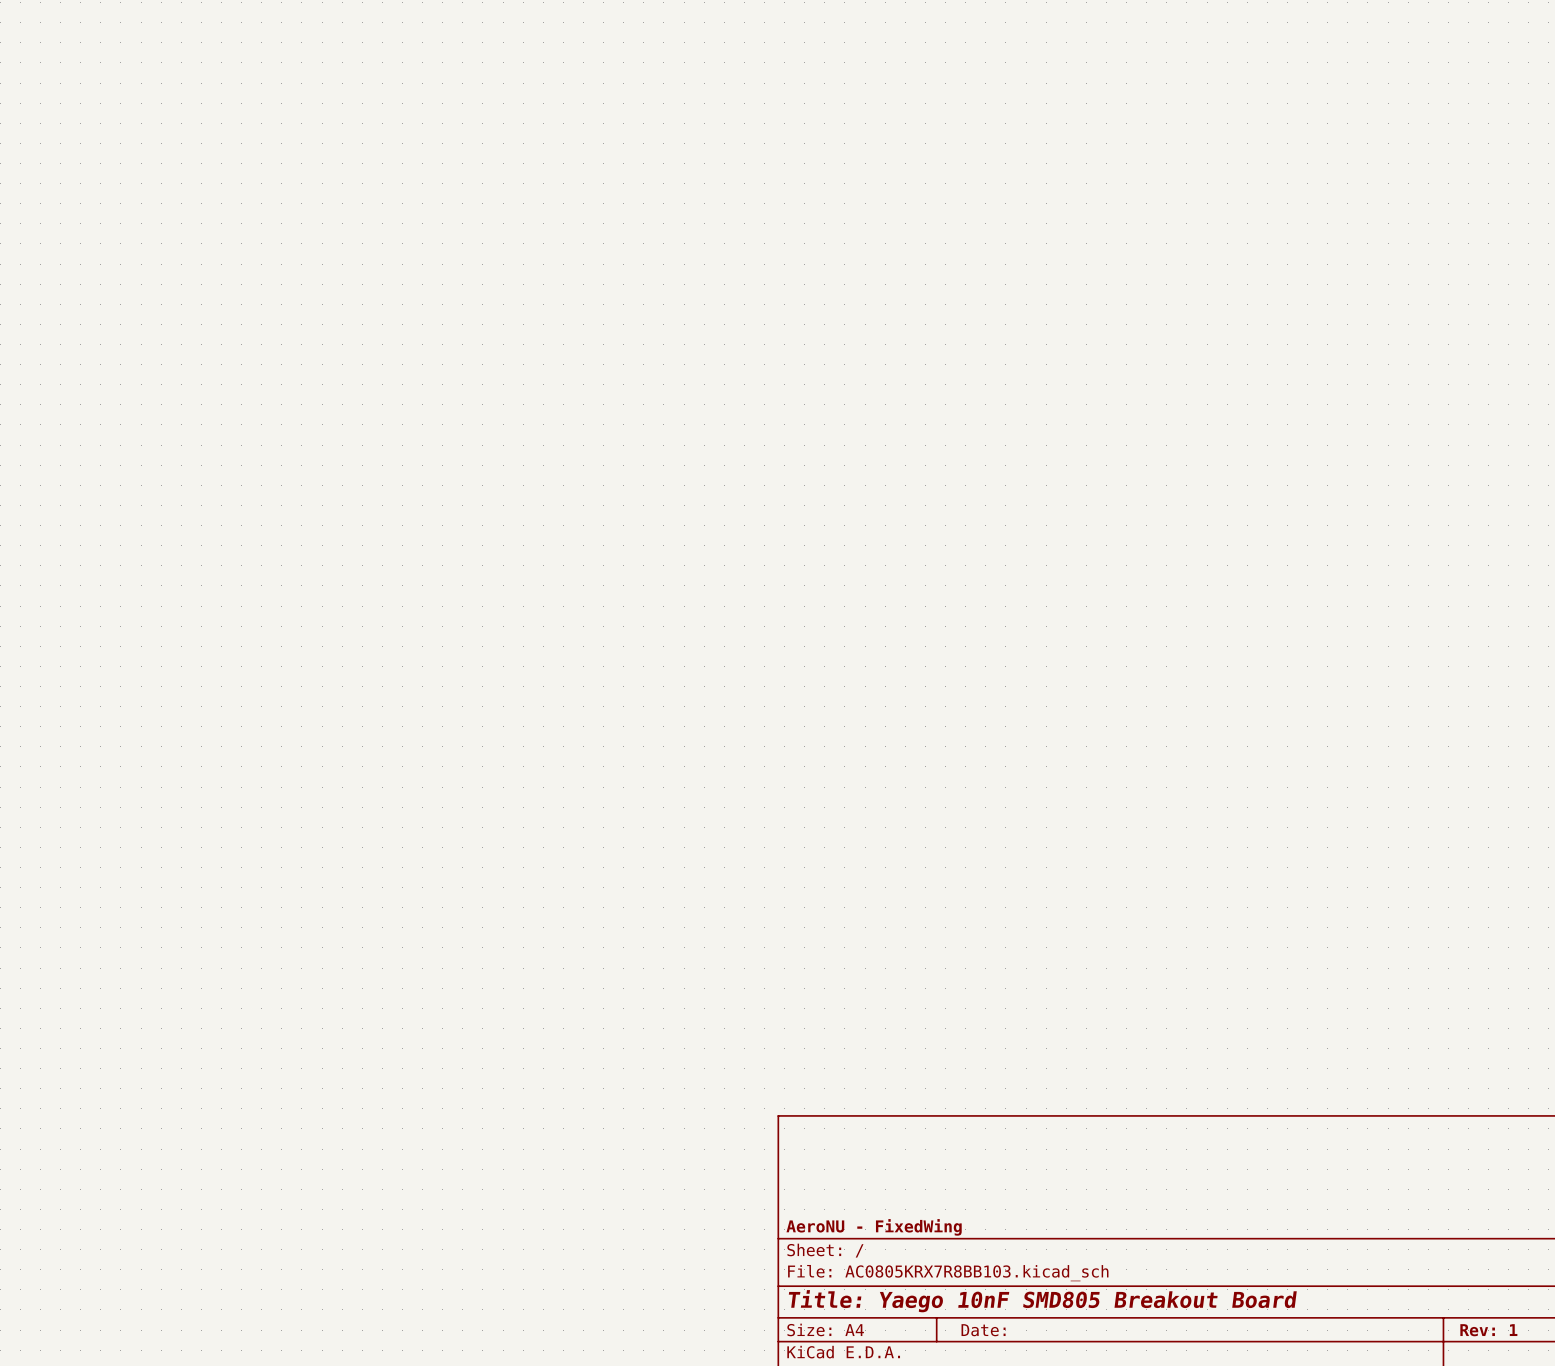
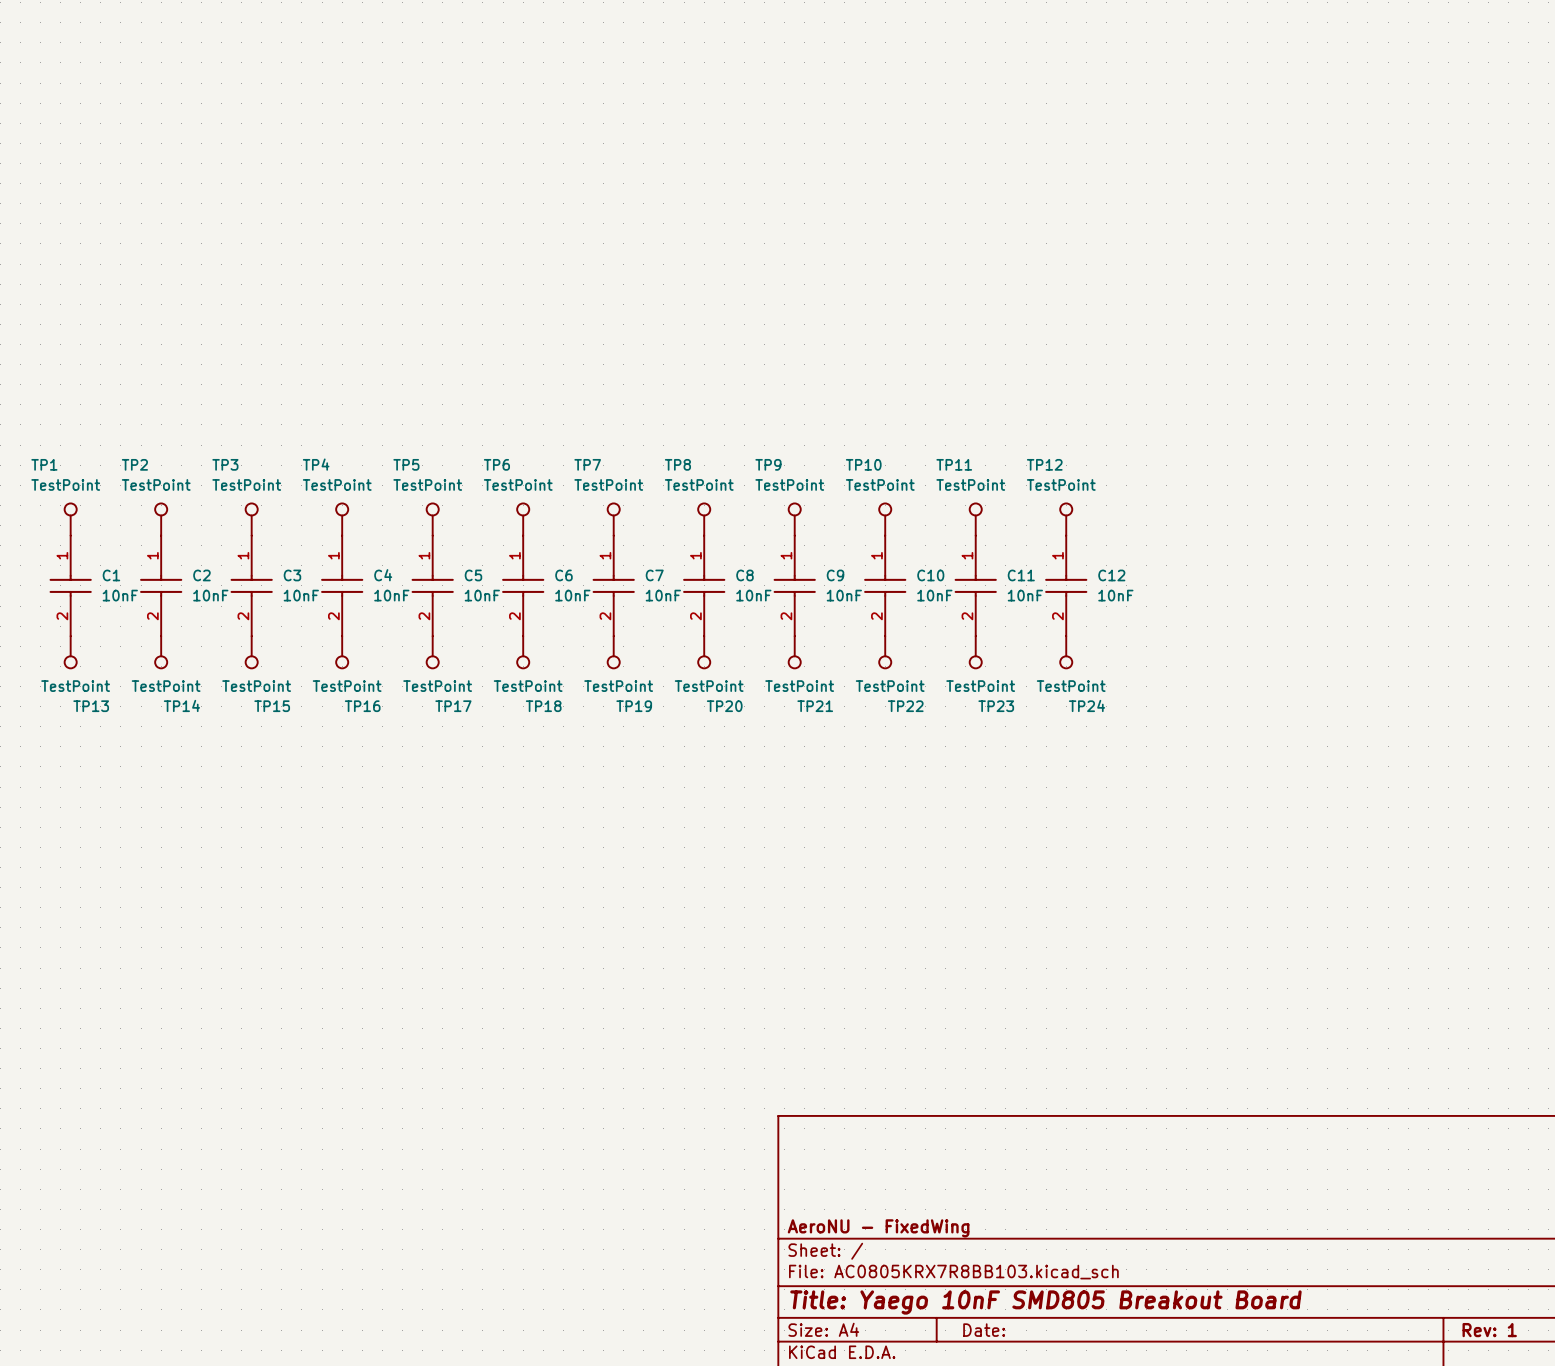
TP1: none -> TestPoint (70, 519)
TP2: none -> TestPoint (161, 519)
TP3: none -> TestPoint (251, 519)
TP4: none -> TestPoint (342, 519)
TP5: none -> TestPoint (432, 519)
TP6: none -> TestPoint (523, 519)
TP7: none -> TestPoint (613, 519)
TP8: none -> TestPoint (704, 519)
TP9: none -> TestPoint (794, 519)
TP10: none -> TestPoint (885, 519)
TP11: none -> TestPoint (975, 519)
TP12: none -> TestPoint (1066, 519)
C1: none -> 10nF (70, 585)
C2: none -> 10nF (161, 585)
C3: none -> 10nF (251, 585)
C4: none -> 10nF (342, 585)
C5: none -> 10nF (432, 585)
C6: none -> 10nF (523, 585)
C7: none -> 10nF (613, 585)
C8: none -> 10nF (704, 585)
C9: none -> 10nF (794, 585)
C10: none -> 10nF (885, 585)
C11: none -> 10nF (975, 585)
C12: none -> 10nF (1066, 585)
TP13: none -> TestPoint (70, 652)
TP14: none -> TestPoint (161, 652)
TP15: none -> TestPoint (251, 652)
TP16: none -> TestPoint (342, 652)
TP17: none -> TestPoint (432, 652)
TP18: none -> TestPoint (523, 652)
TP19: none -> TestPoint (613, 652)
TP20: none -> TestPoint (704, 652)
TP21: none -> TestPoint (794, 652)
TP22: none -> TestPoint (885, 652)
TP23: none -> TestPoint (975, 652)
TP24: none -> TestPoint (1066, 652)

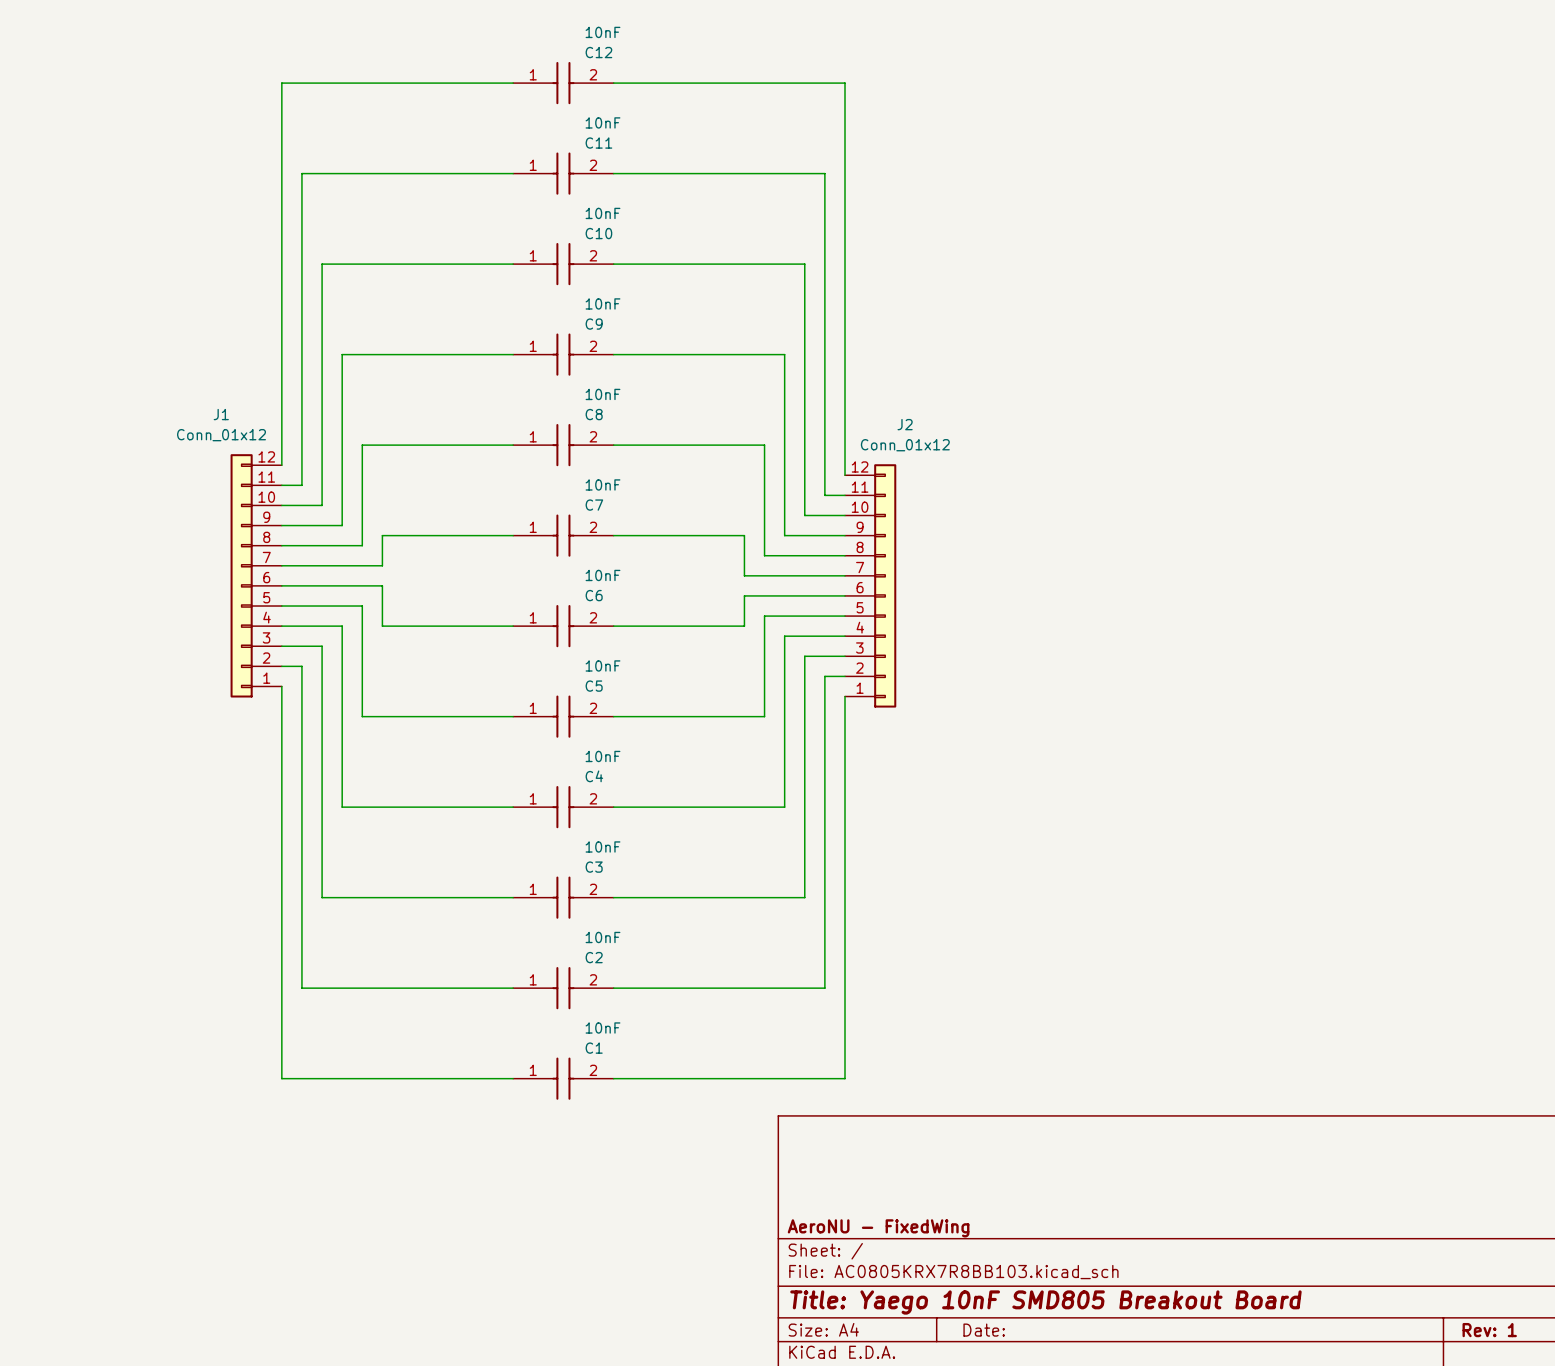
wire: none -> (513, 83) (281, 83) (281, 465)
wire: none -> (613, 83) (844, 83) (844, 475)
wire: none -> (513, 173) (301, 173) (301, 485) (281, 485)
wire: none -> (613, 173) (824, 173) (824, 495) (844, 495)
wire: none -> (513, 264) (322, 264) (322, 505) (281, 505)
wire: none -> (613, 264) (804, 264) (804, 515) (844, 515)
wire: none -> (513, 354) (342, 354) (342, 525) (281, 525)
wire: none -> (613, 354) (784, 354) (784, 535) (844, 535)
wire: none -> (513, 445) (362, 445) (362, 545) (281, 545)
wire: none -> (613, 445) (764, 445) (764, 555) (844, 555)
TP1: TestPoint (70, 519) -> none
TP2: TestPoint (161, 519) -> none
TP3: TestPoint (251, 519) -> none
TP4: TestPoint (342, 519) -> none
TP5: TestPoint (432, 519) -> none
TP6: TestPoint (523, 519) -> none
TP7: TestPoint (613, 519) -> none
TP8: TestPoint (704, 519) -> none
TP9: TestPoint (794, 519) -> none
TP10: TestPoint (885, 519) -> none
TP11: TestPoint (975, 519) -> none
TP12: TestPoint (1066, 519) -> none
wire: none -> (513, 535) (382, 535) (382, 565) (281, 565)
wire: none -> (613, 535) (744, 535) (744, 575) (844, 575)
C1 name position: C1 (111, 575) -> C1 (594, 1048)
C2 name position: C2 (201, 575) -> C2 (594, 957)
J1: none -> Conn_01x12 (256, 575)
C3 name position: C3 (292, 575) -> C3 (594, 867)
C4 name position: C4 (383, 575) -> C4 (594, 776)
C5 name position: C5 (473, 575) -> C5 (594, 686)
C6 name position: C6 (563, 575) -> C6 (594, 595)
C7 name position: C7 (654, 575) -> C7 (594, 505)
C8 name position: C8 (744, 575) -> C8 (594, 414)
C9 name position: C9 (835, 575) -> C9 (594, 324)
C10 name position: C10 (930, 575) -> C10 (598, 233)
C11 name position: C11 (1021, 575) -> C11 (598, 143)
C12 name position: C12 (1111, 575) -> C12 (598, 52)
C1 rotation: 0° (70, 585) -> 90° counterclockwise (563, 1078)
C1 position: (70, 585) -> (563, 1078)
C2 rotation: 0° (161, 585) -> 90° counterclockwise (563, 988)
C2 position: (161, 585) -> (563, 988)
C3 rotation: 0° (251, 585) -> 90° counterclockwise (563, 897)
C3 position: (251, 585) -> (563, 897)
wire: none -> (281, 585) (382, 585) (382, 626) (513, 626)
C4 rotation: 0° (342, 585) -> 90° counterclockwise (563, 807)
C4 position: (342, 585) -> (563, 807)
C5 rotation: 0° (432, 585) -> 90° counterclockwise (563, 716)
C5 position: (432, 585) -> (563, 716)
C6 rotation: 0° (523, 585) -> 90° counterclockwise (563, 626)
C7 rotation: 0° (613, 585) -> 90° counterclockwise (563, 535)
C7 position: (613, 585) -> (563, 535)
C8 rotation: 0° (704, 585) -> 90° counterclockwise (563, 445)
C8 position: (704, 585) -> (563, 445)
C9 rotation: 0° (794, 585) -> 90° counterclockwise (563, 354)
C9 position: (794, 585) -> (563, 354)
J2: none -> Conn_01x12 (870, 585)
C10 rotation: 0° (885, 585) -> 90° counterclockwise (563, 264)
C10 position: (885, 585) -> (563, 264)
C11 rotation: 0° (975, 585) -> 90° counterclockwise (563, 173)
C11 position: (975, 585) -> (563, 173)
C12 rotation: 0° (1066, 585) -> 90° counterclockwise (563, 83)
C12 position: (1066, 585) -> (563, 83)
C1 value position: 10nF (120, 595) -> 10nF (603, 1027)
C2 value position: 10nF (210, 595) -> 10nF (603, 937)
C3 value position: 10nF (301, 595) -> 10nF (603, 846)
C4 value position: 10nF (391, 595) -> 10nF (603, 756)
C5 value position: 10nF (482, 595) -> 10nF (603, 665)
C6 value position: 10nF (572, 595) -> 10nF (603, 575)
C7 value position: 10nF (663, 595) -> 10nF (603, 484)
C8 value position: 10nF (753, 595) -> 10nF (603, 394)
wire: none -> (844, 595) (744, 595) (744, 626) (613, 626)
C9 value position: 10nF (844, 595) -> 10nF (603, 303)
C10 value position: 10nF (934, 595) -> 10nF (603, 213)
C11 value position: 10nF (1025, 595) -> 10nF (603, 122)
C12 value position: 10nF (1115, 595) -> 10nF (603, 32)
wire: none -> (281, 606) (362, 606) (362, 716) (513, 716)
wire: none -> (844, 616) (764, 616) (764, 716) (613, 716)
wire: none -> (281, 626) (342, 626) (342, 807) (513, 807)
wire: none -> (844, 636) (784, 636) (784, 807) (613, 807)
wire: none -> (281, 646) (322, 646) (322, 897) (513, 897)
TP13: TestPoint (70, 652) -> none
TP14: TestPoint (161, 652) -> none
TP15: TestPoint (251, 652) -> none
TP16: TestPoint (342, 652) -> none
TP17: TestPoint (432, 652) -> none
TP18: TestPoint (523, 652) -> none
TP19: TestPoint (613, 652) -> none
TP20: TestPoint (704, 652) -> none
TP21: TestPoint (794, 652) -> none
TP22: TestPoint (885, 652) -> none
TP23: TestPoint (975, 652) -> none
TP24: TestPoint (1066, 652) -> none
wire: none -> (844, 656) (804, 656) (804, 897) (613, 897)
wire: none -> (281, 666) (301, 666) (301, 988) (513, 988)
wire: none -> (844, 676) (824, 676) (824, 988) (613, 988)
wire: none -> (281, 686) (281, 1078) (513, 1078)
wire: none -> (844, 696) (844, 1078) (613, 1078)

